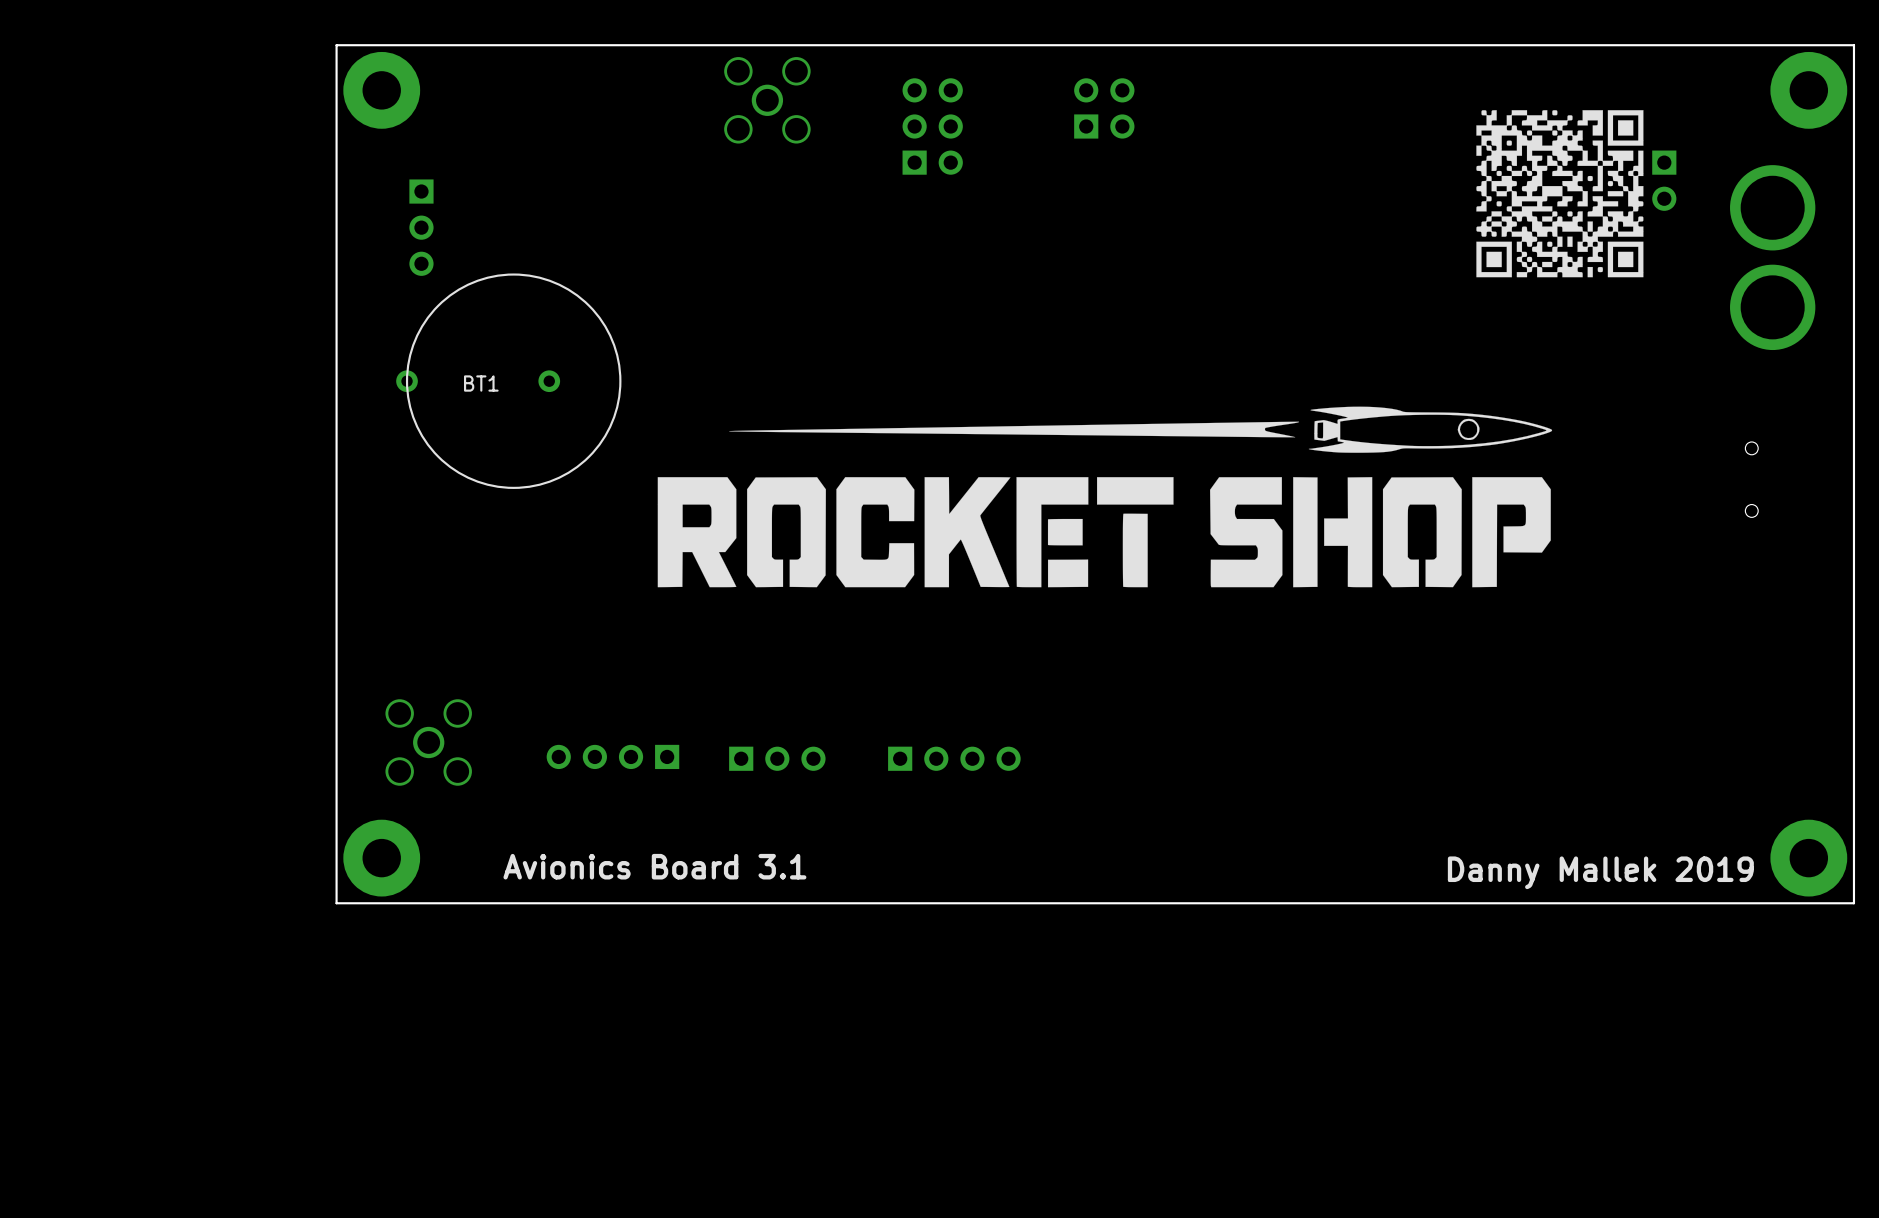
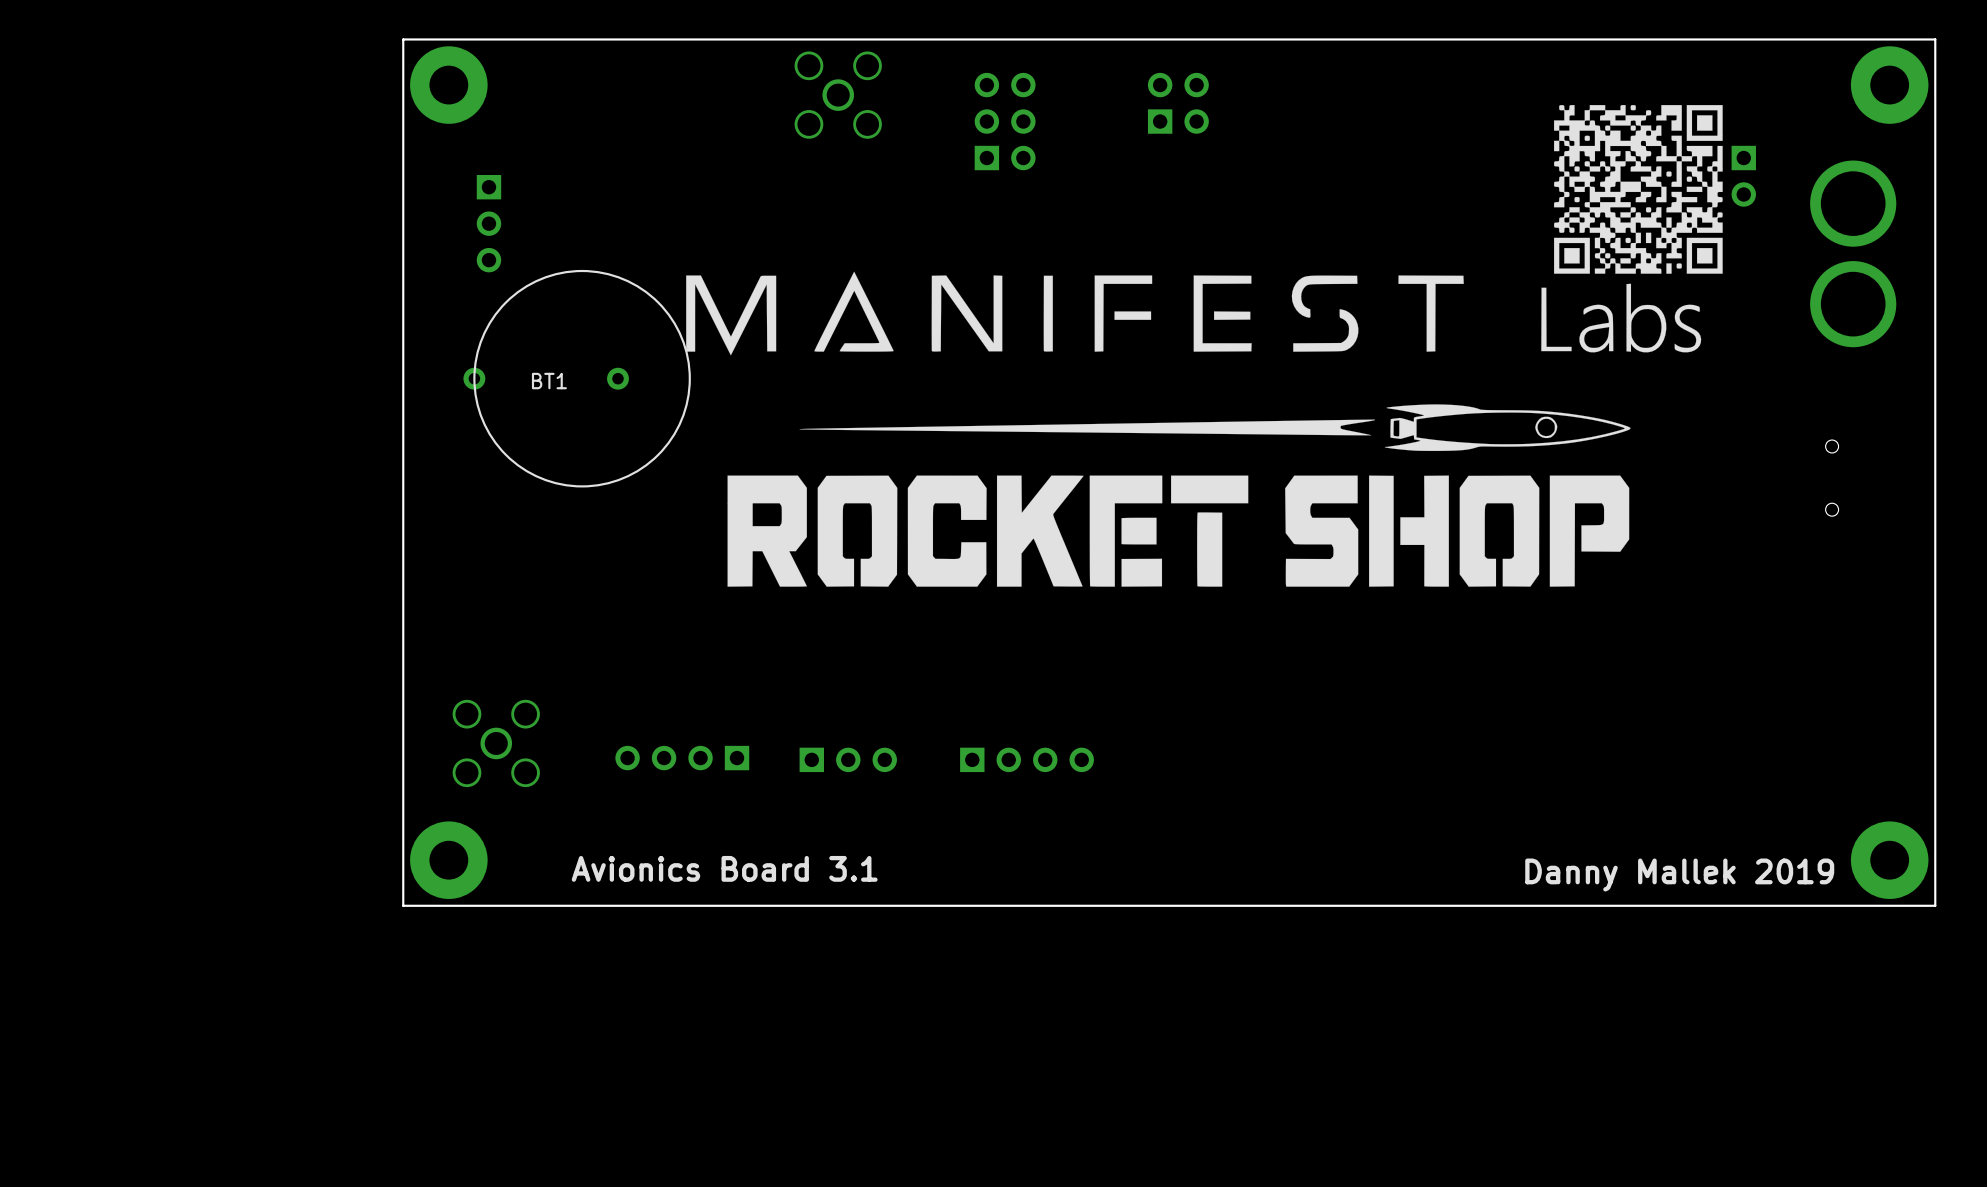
drawing: none -> [686, 271, 1702, 356]

